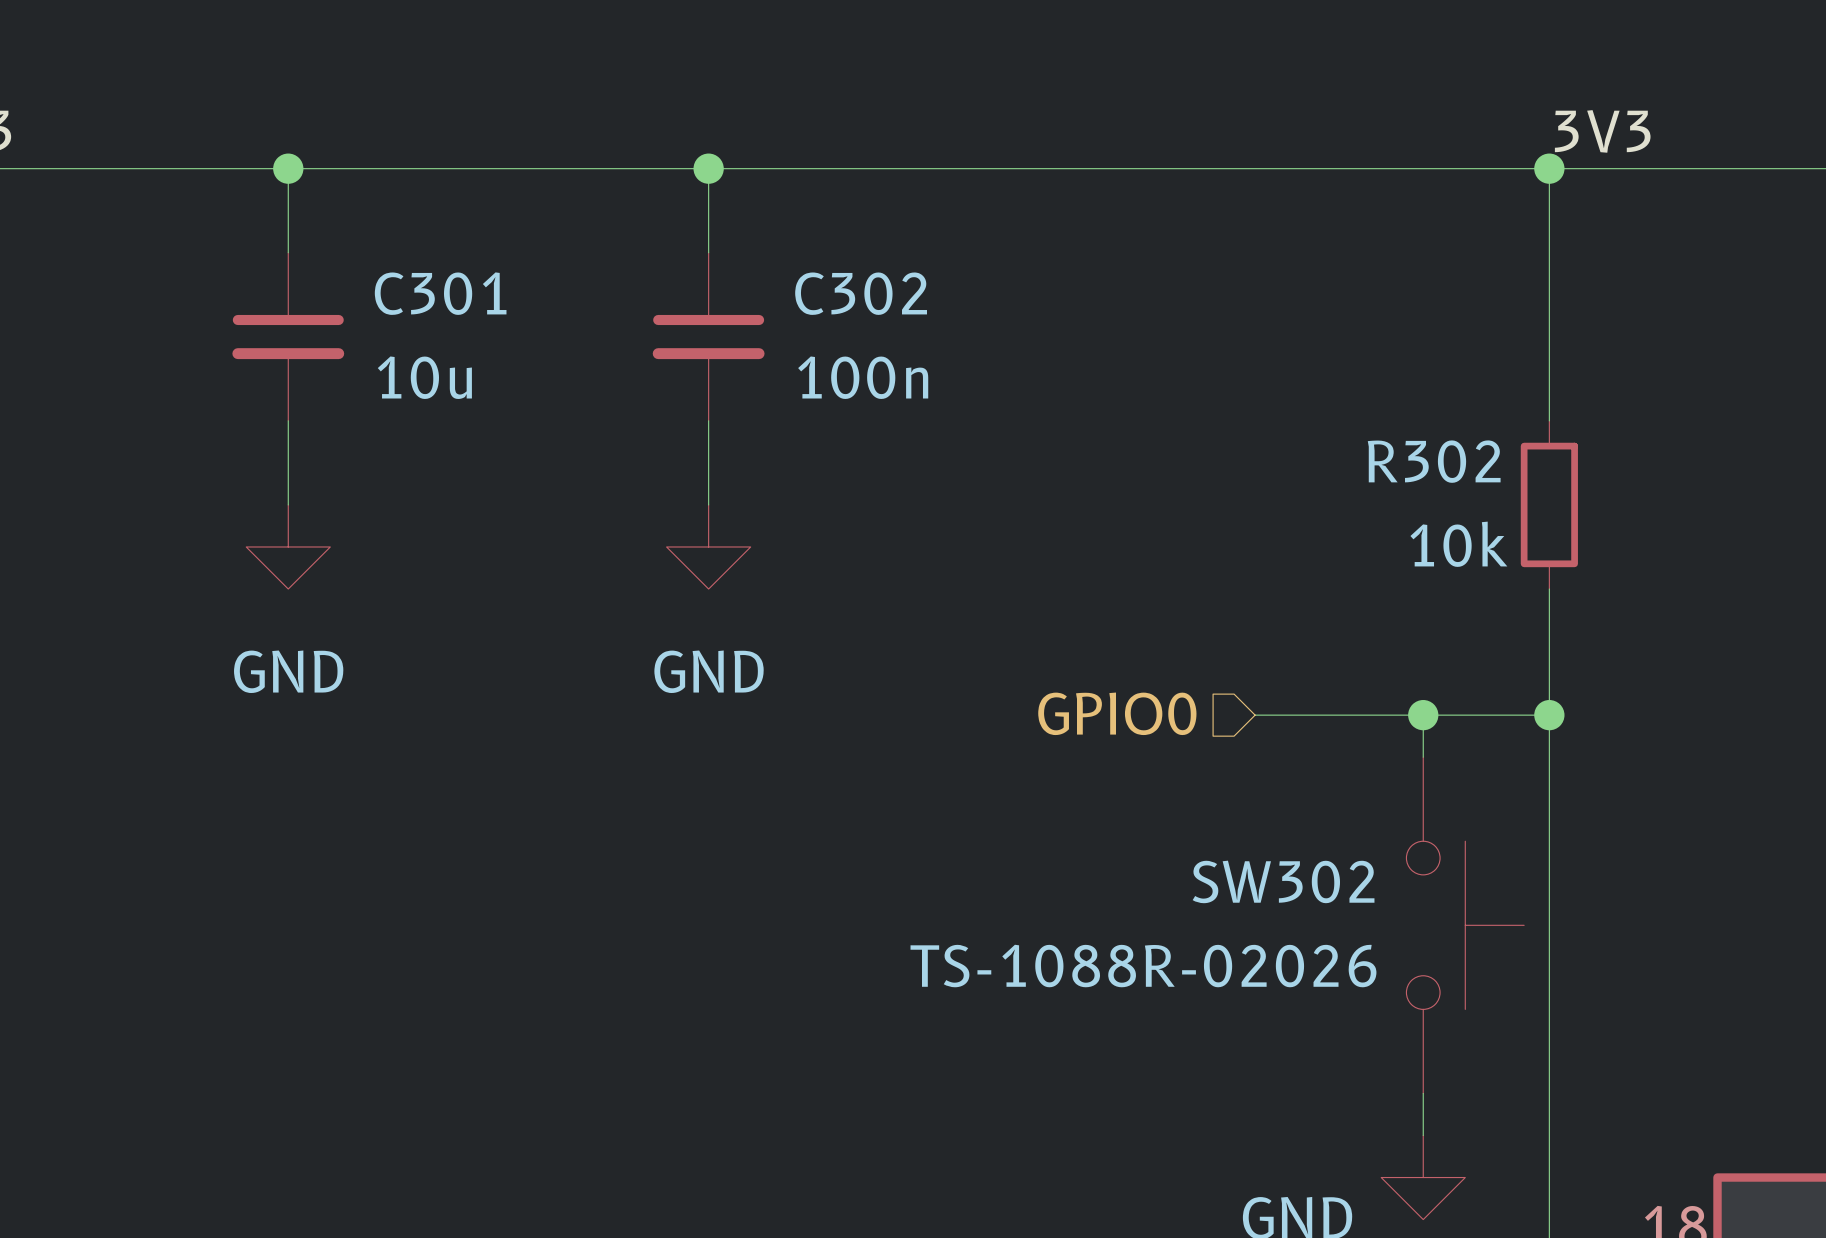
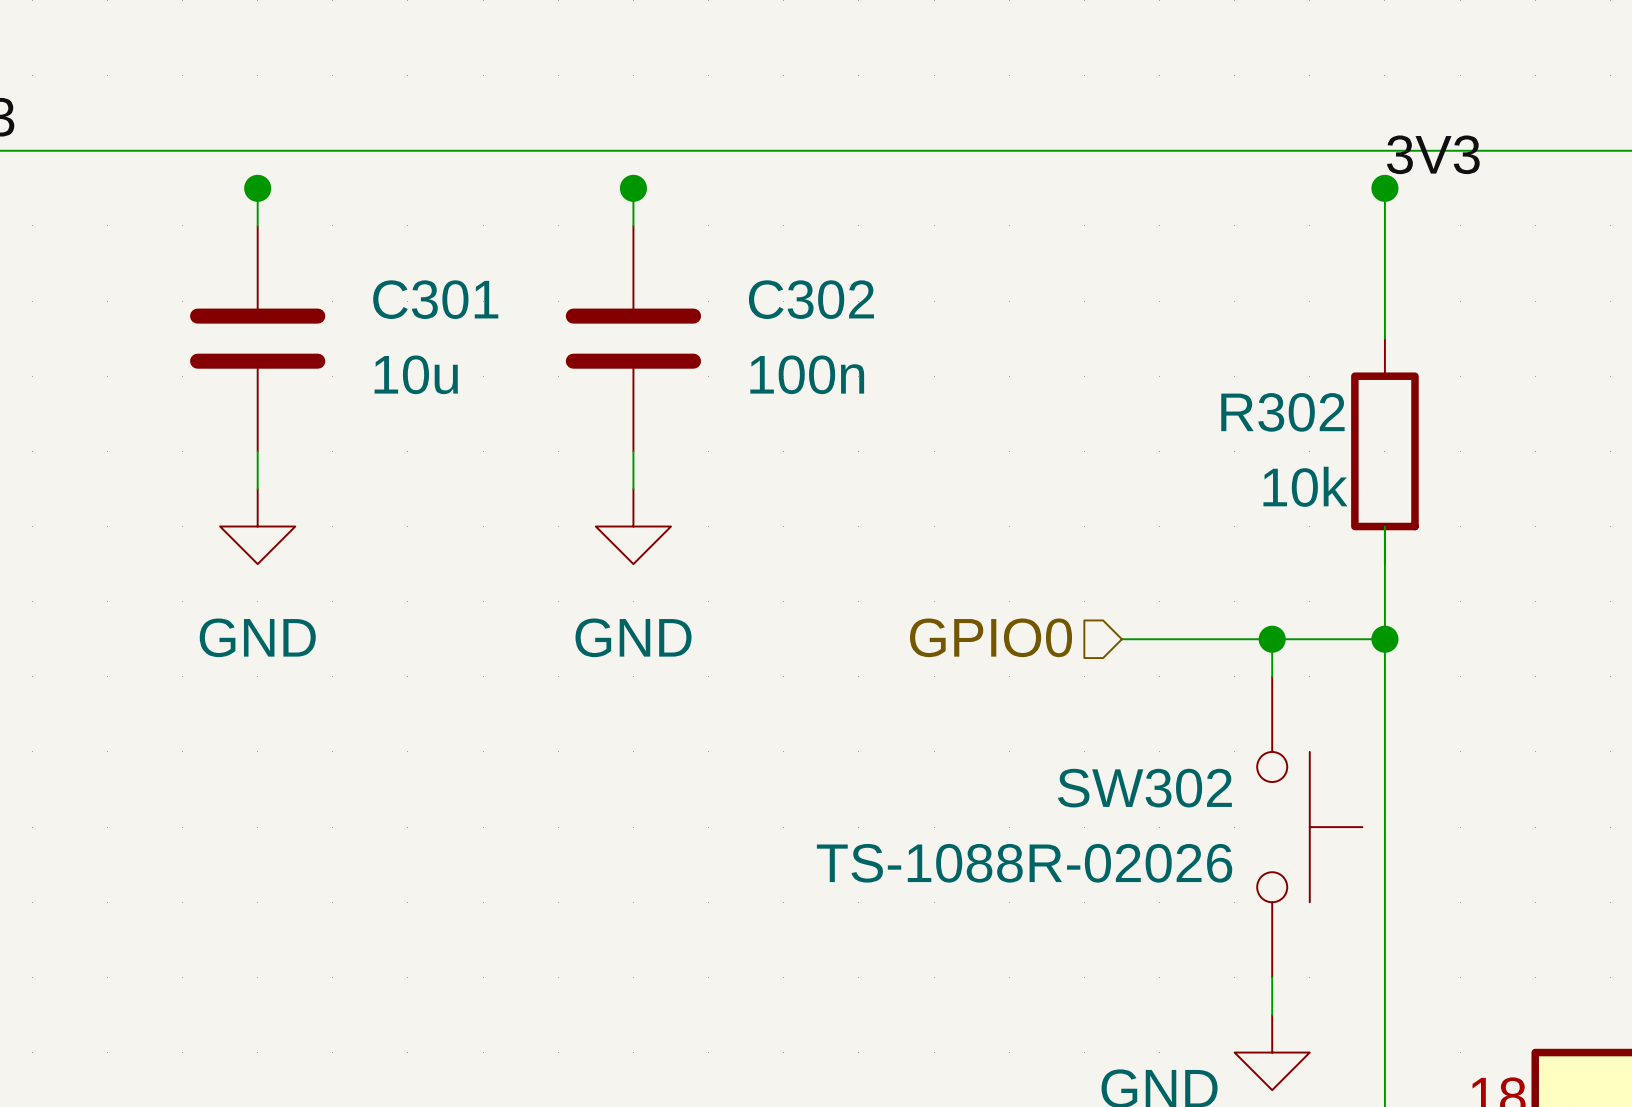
label position: 3V3 (1602, 131) -> 3V3 (1433, 154)
wire: (288, 168) (288, 210) -> none
junction position: (288, 168) -> (257, 188)
wire: (708, 168) (708, 210) -> none
junction position: (708, 168) -> (633, 188)
wire: (1549, 168) (1549, 210) -> none
junction position: (1549, 168) -> (1384, 188)
C301 symbol: [232, 252, 345, 421] -> [190, 225, 326, 452]
C302 symbol: [652, 252, 765, 421] -> [565, 225, 702, 452]
R302 symbol: [1520, 420, 1578, 590] -> [1351, 338, 1419, 565]
power symbol position: GND (288, 546) -> GND (257, 526)
power symbol position: GND (708, 546) -> GND (633, 526)

